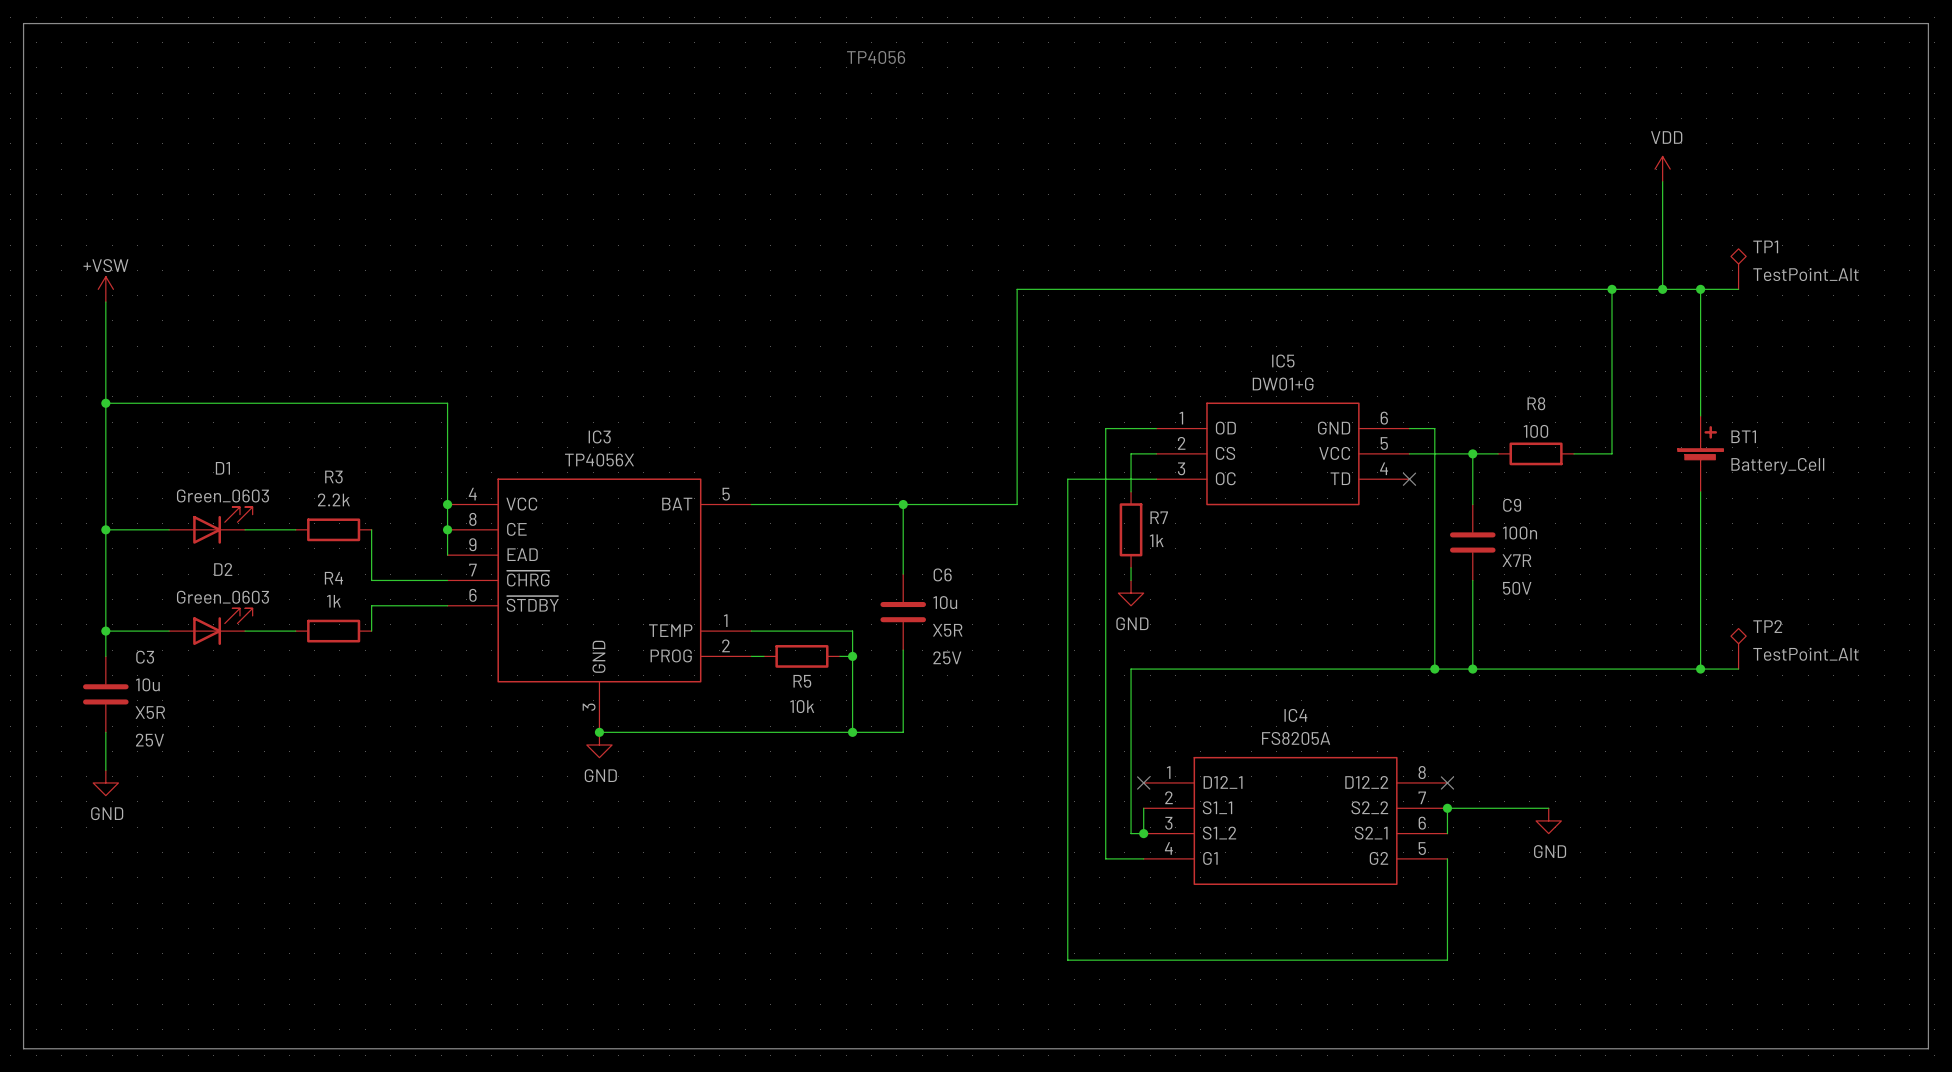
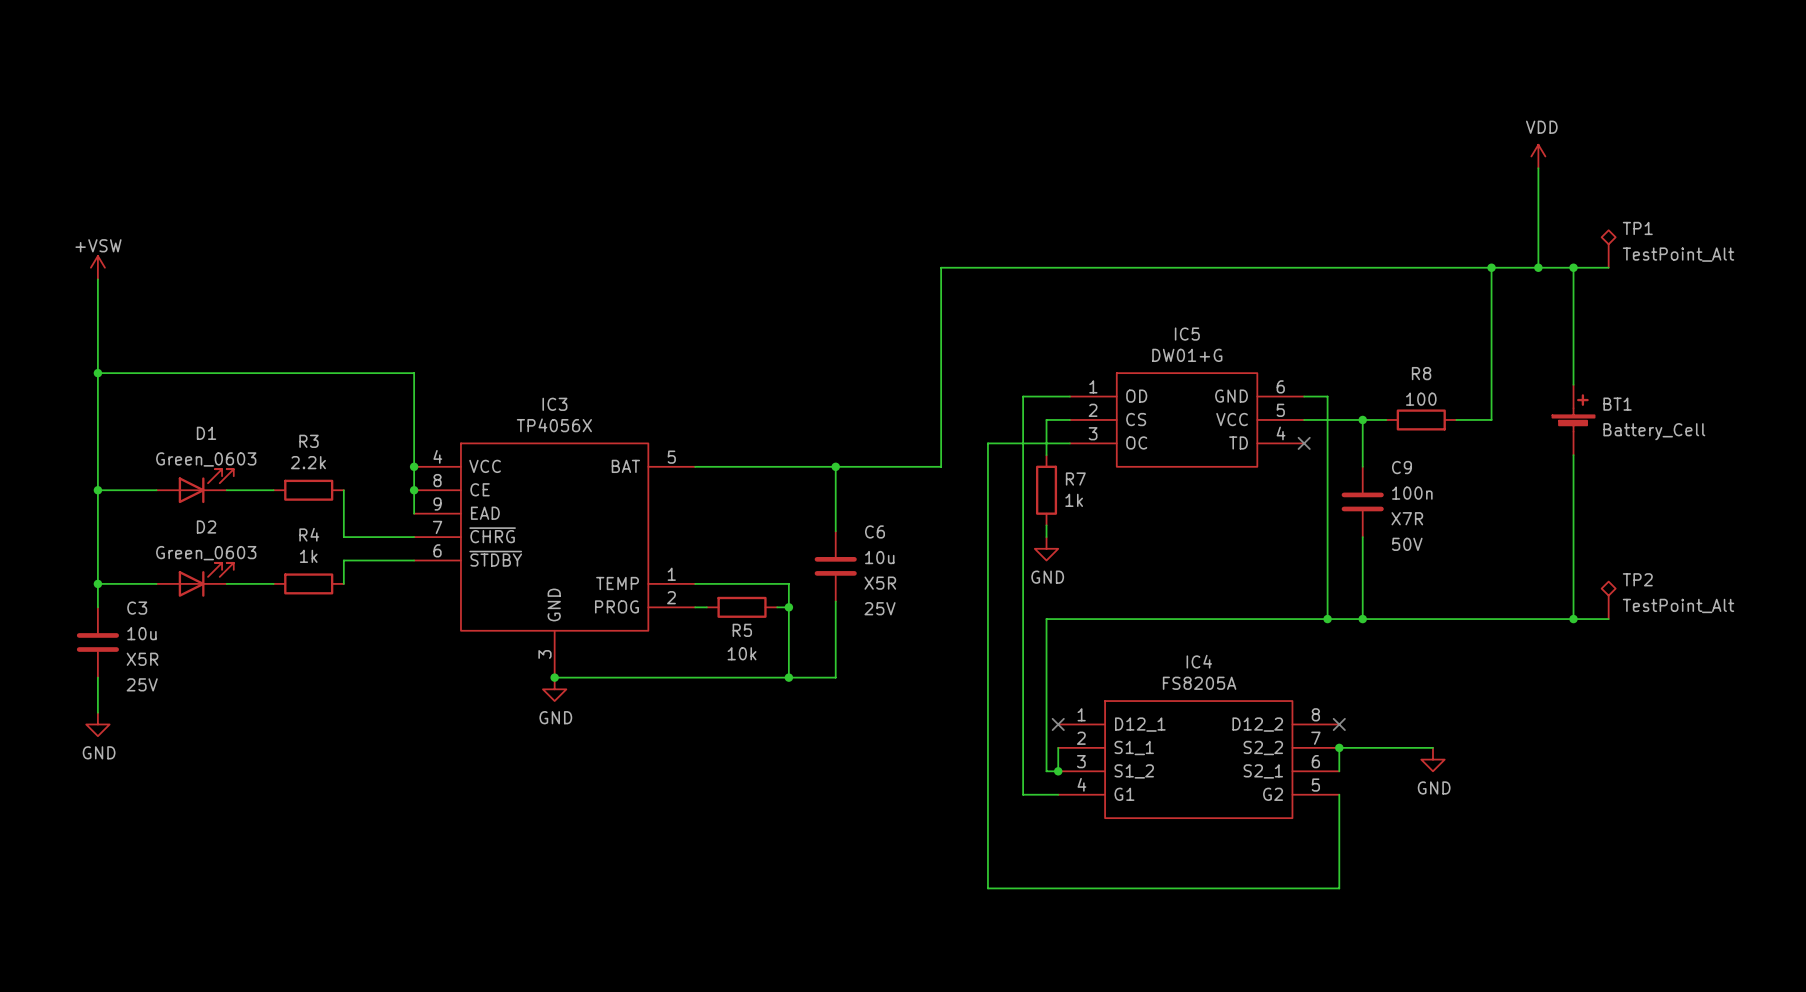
line: (23, 23) (23, 1048) (1928, 1048) (1928, 23) (23, 23) -> none
text: TP4056 (876, 57) -> none

